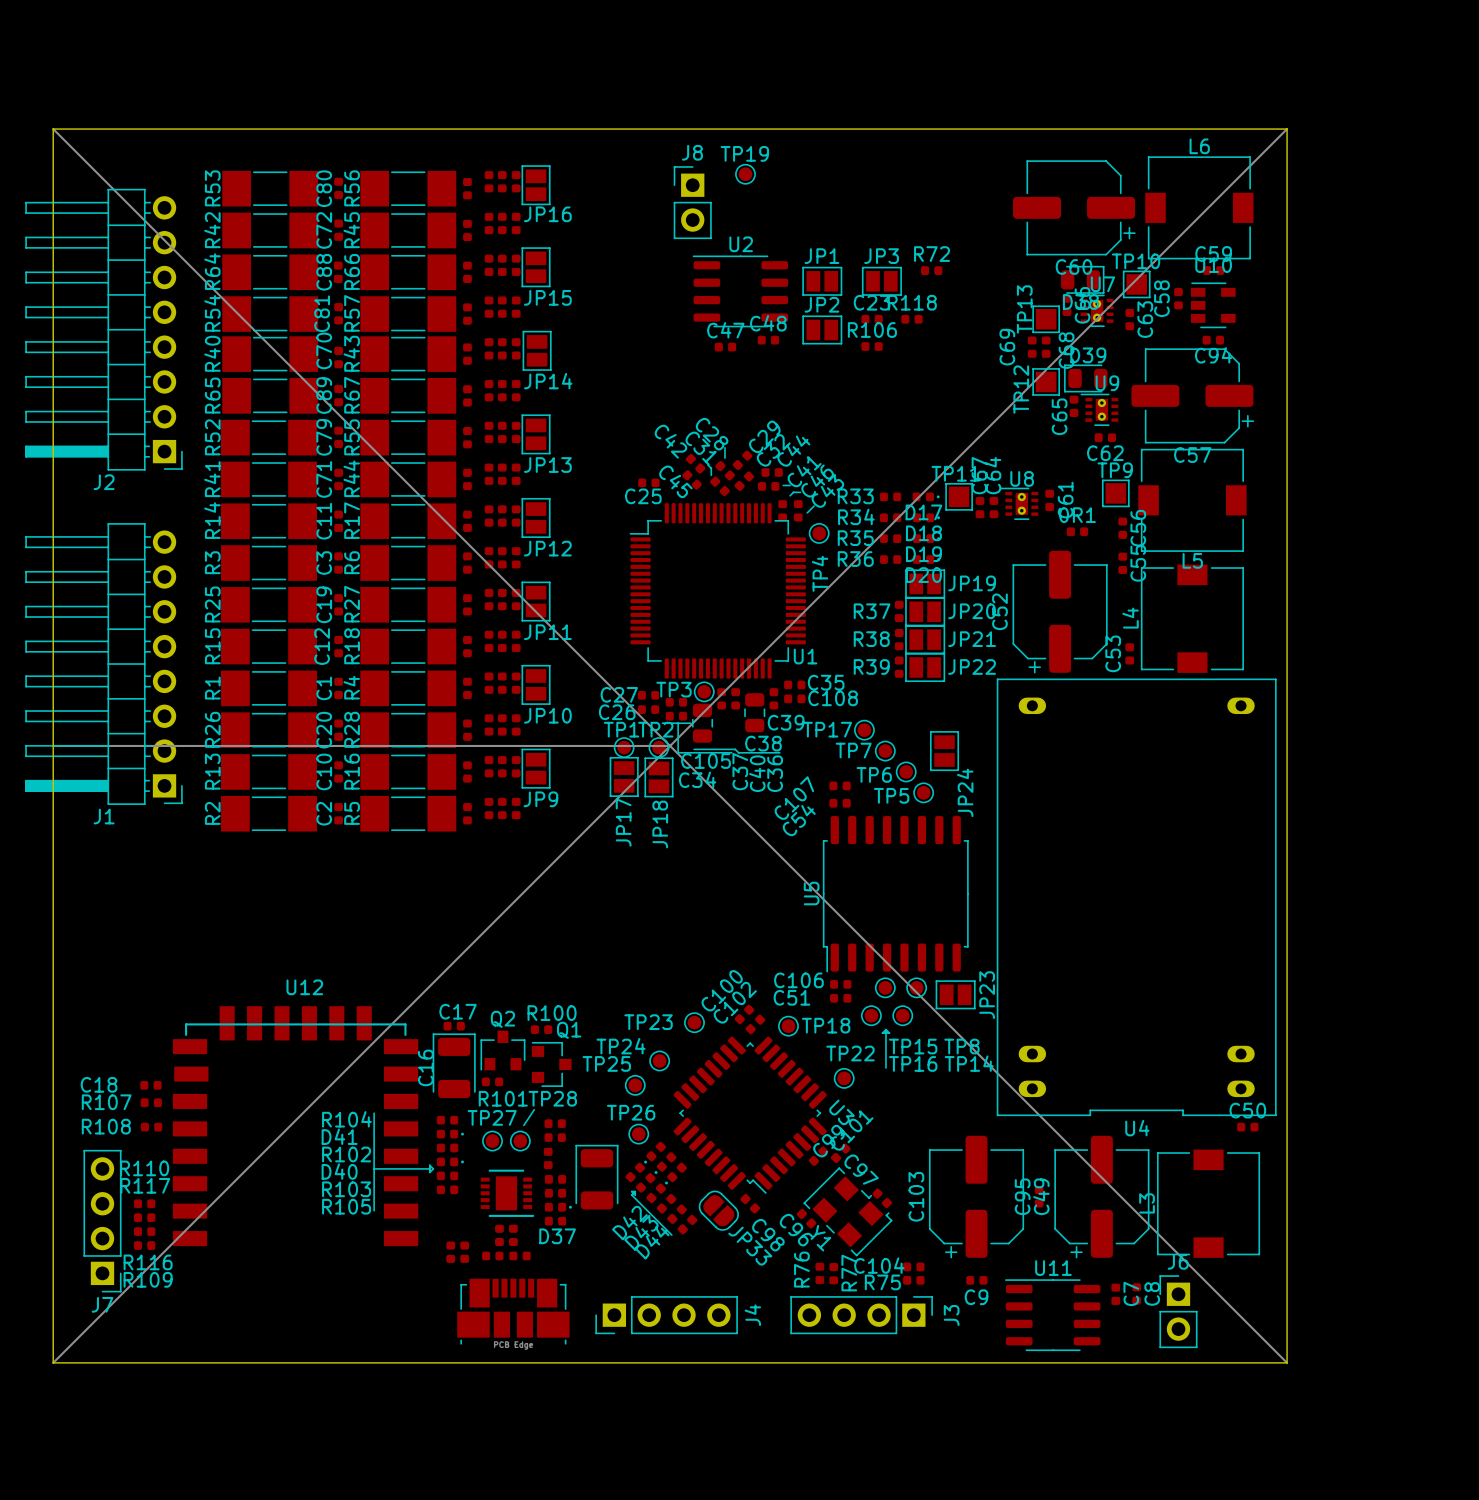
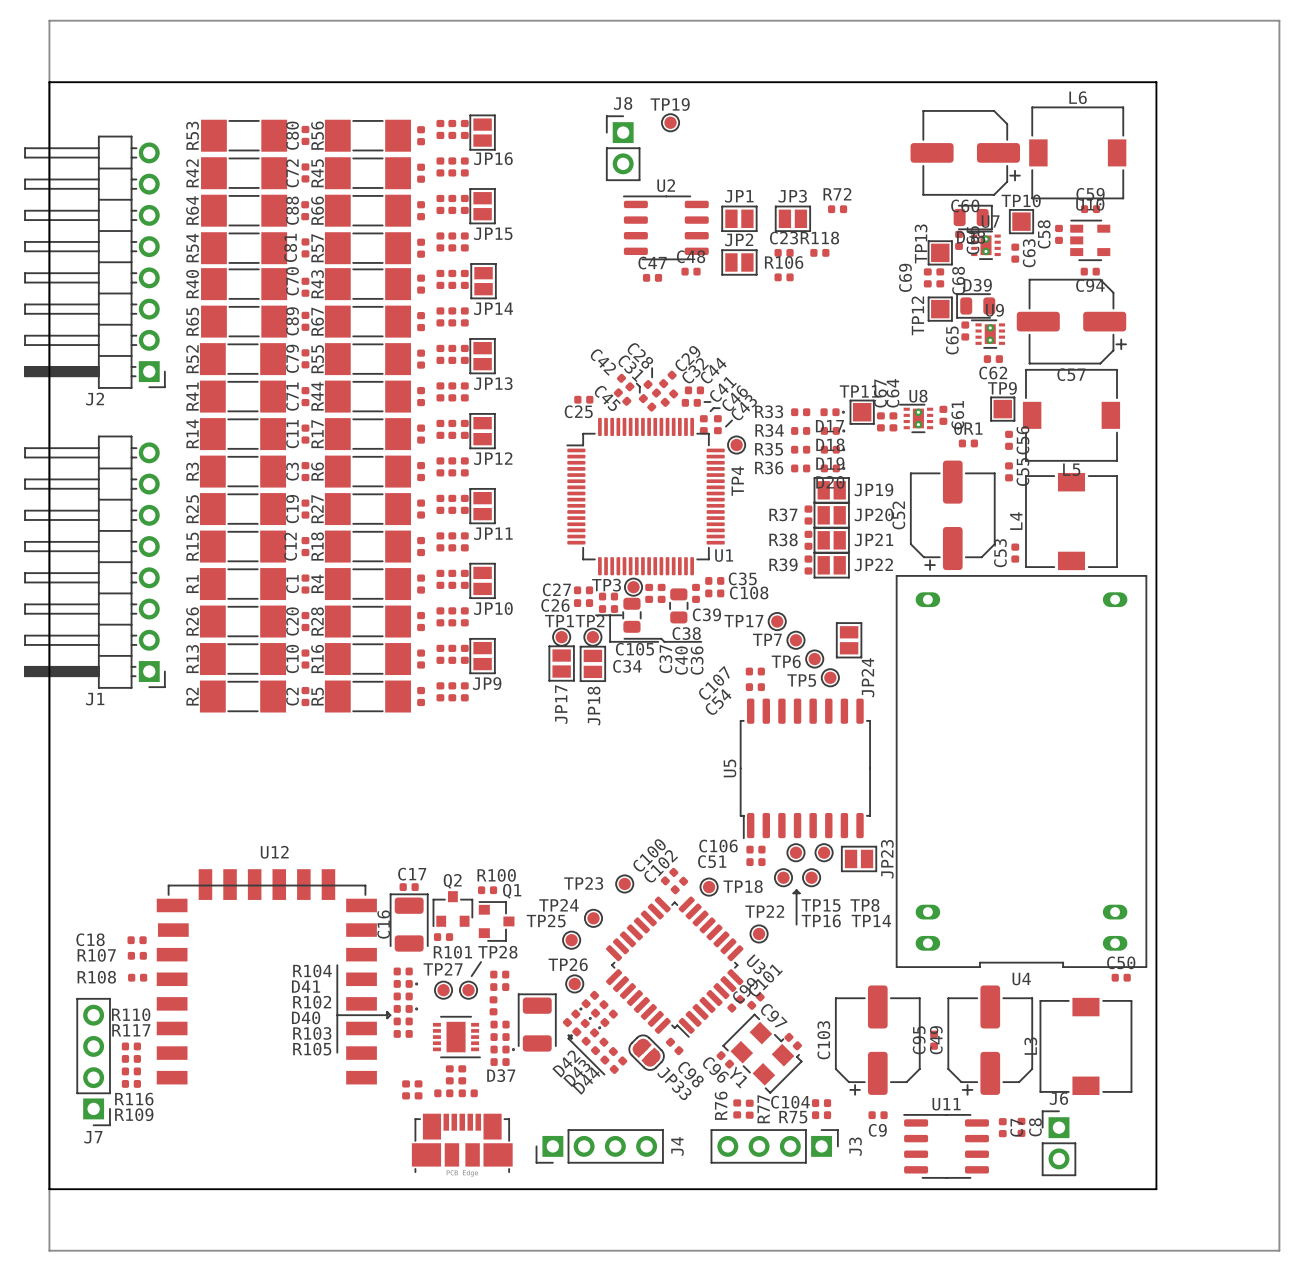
line: none -> (49, 20) (49, 1250) (1279, 1250) (1279, 20) (49, 20)
line: (53, 129) (1287, 1362) -> none
line: (1287, 129) (53, 1362) -> none
line: (53, 745) (670, 745) -> none

